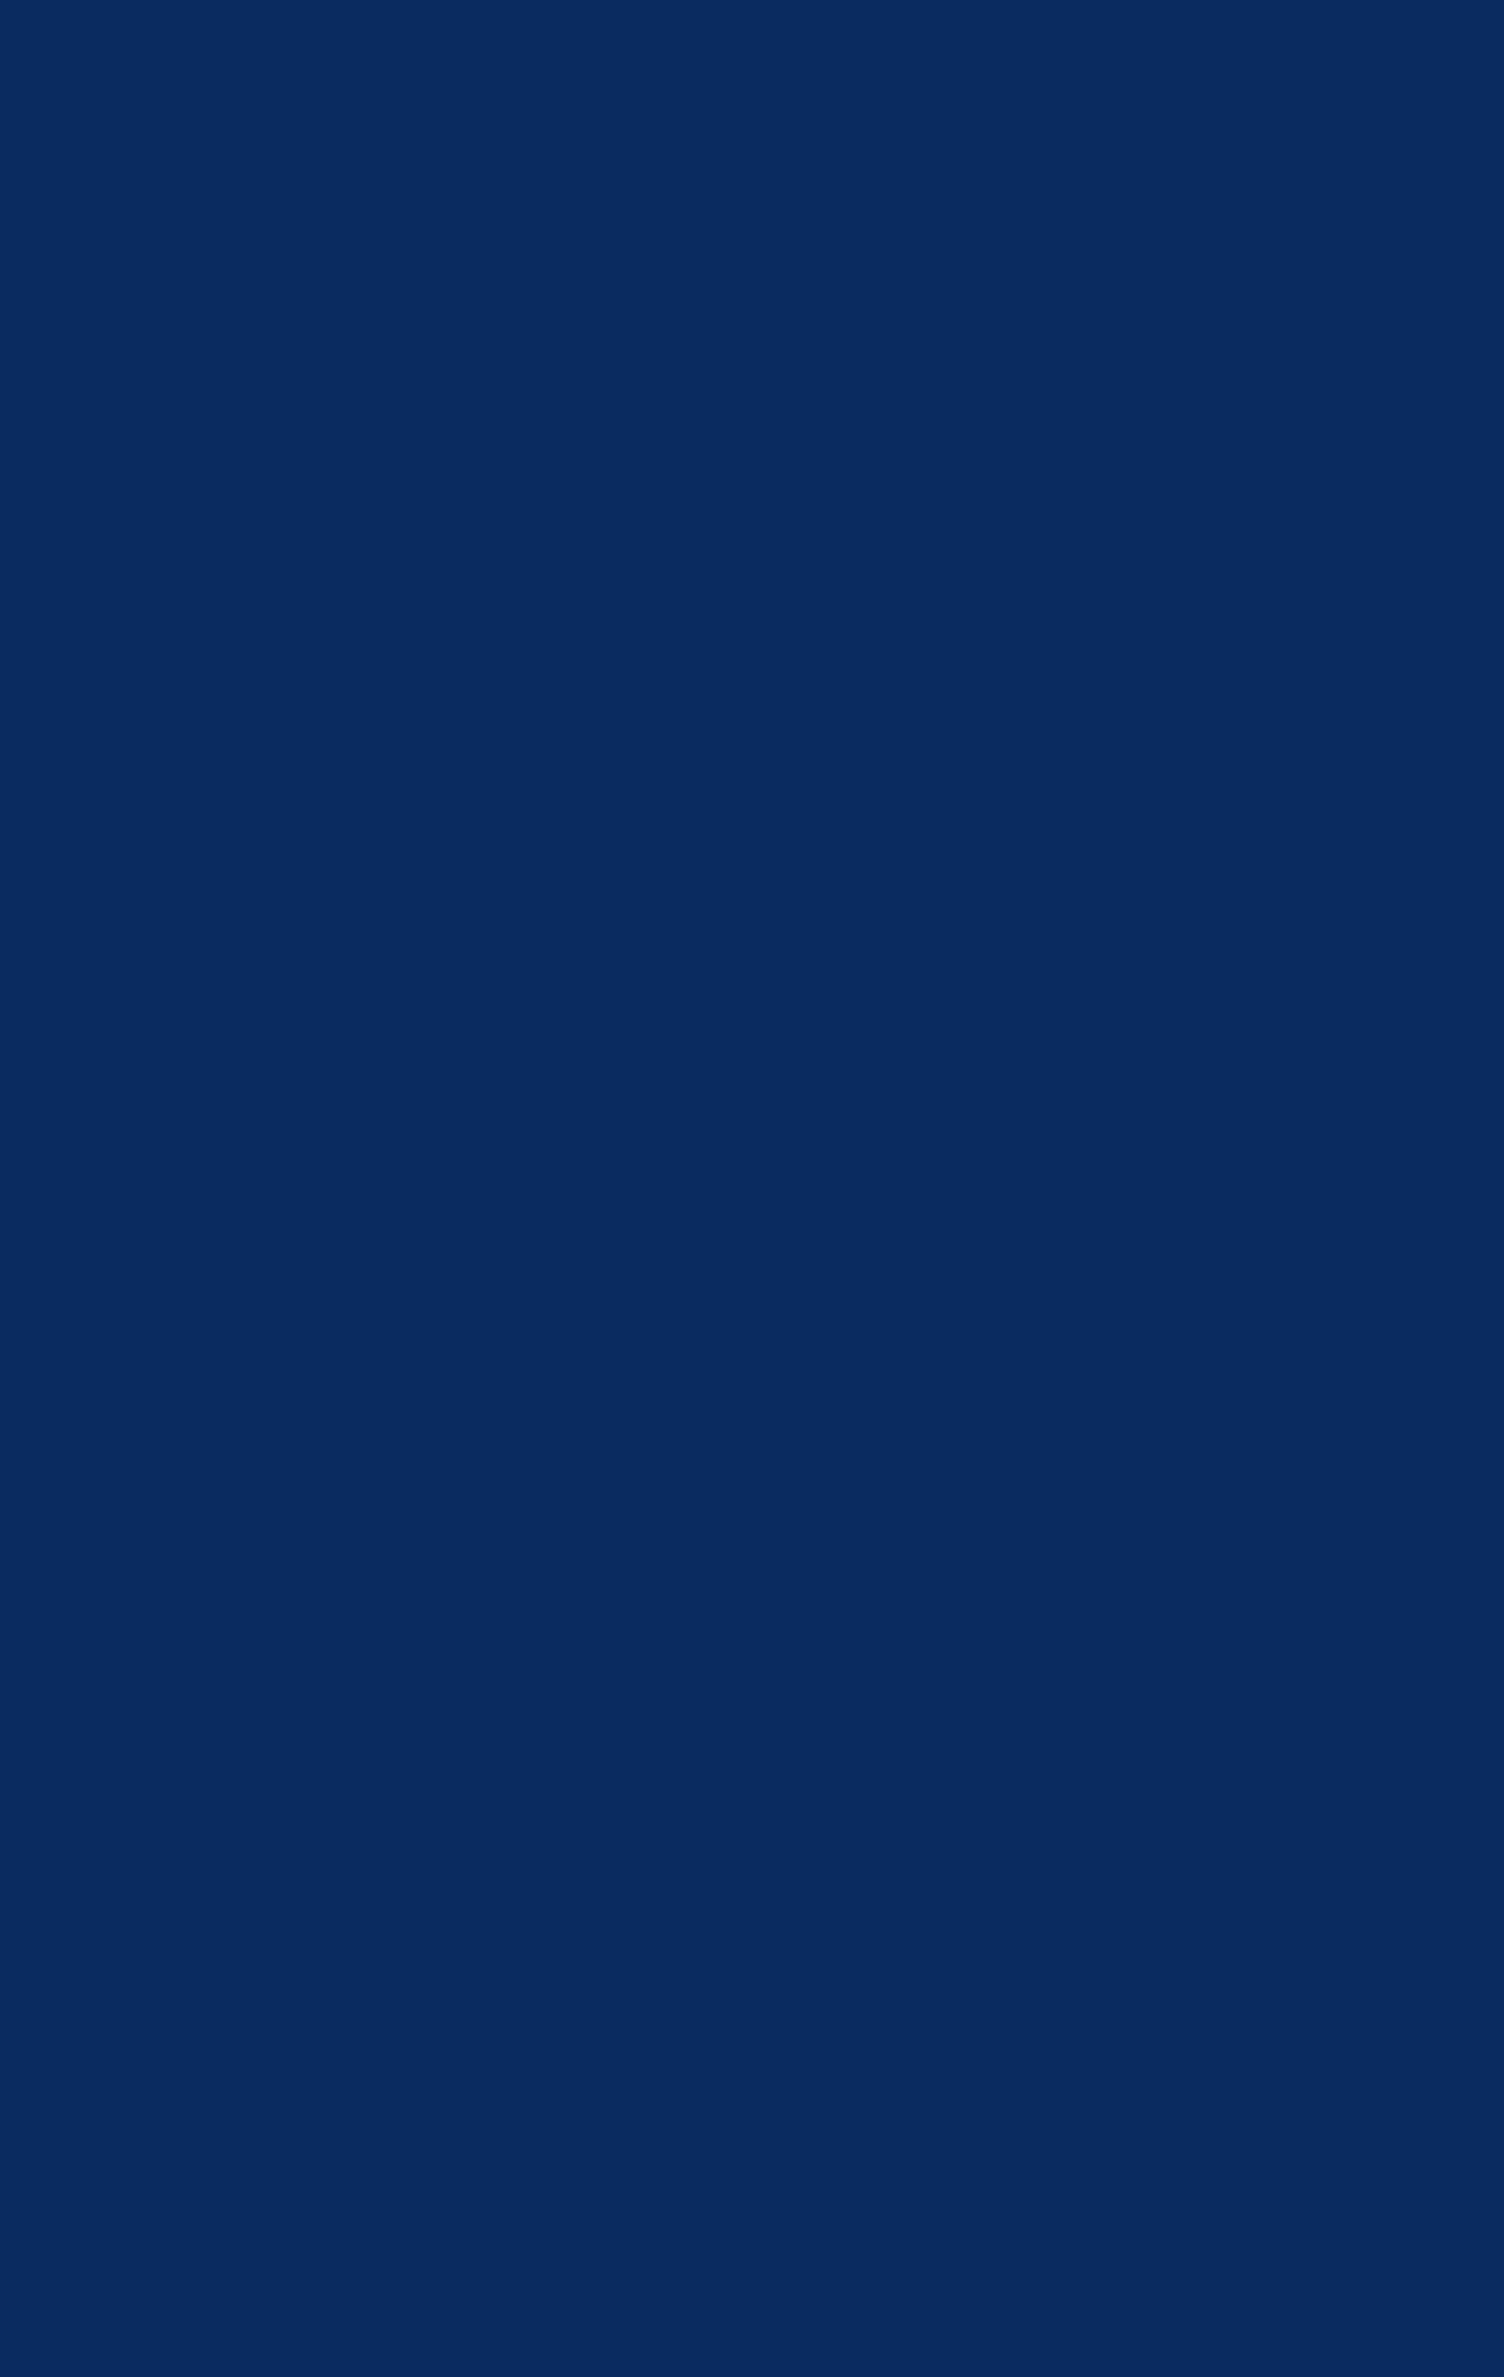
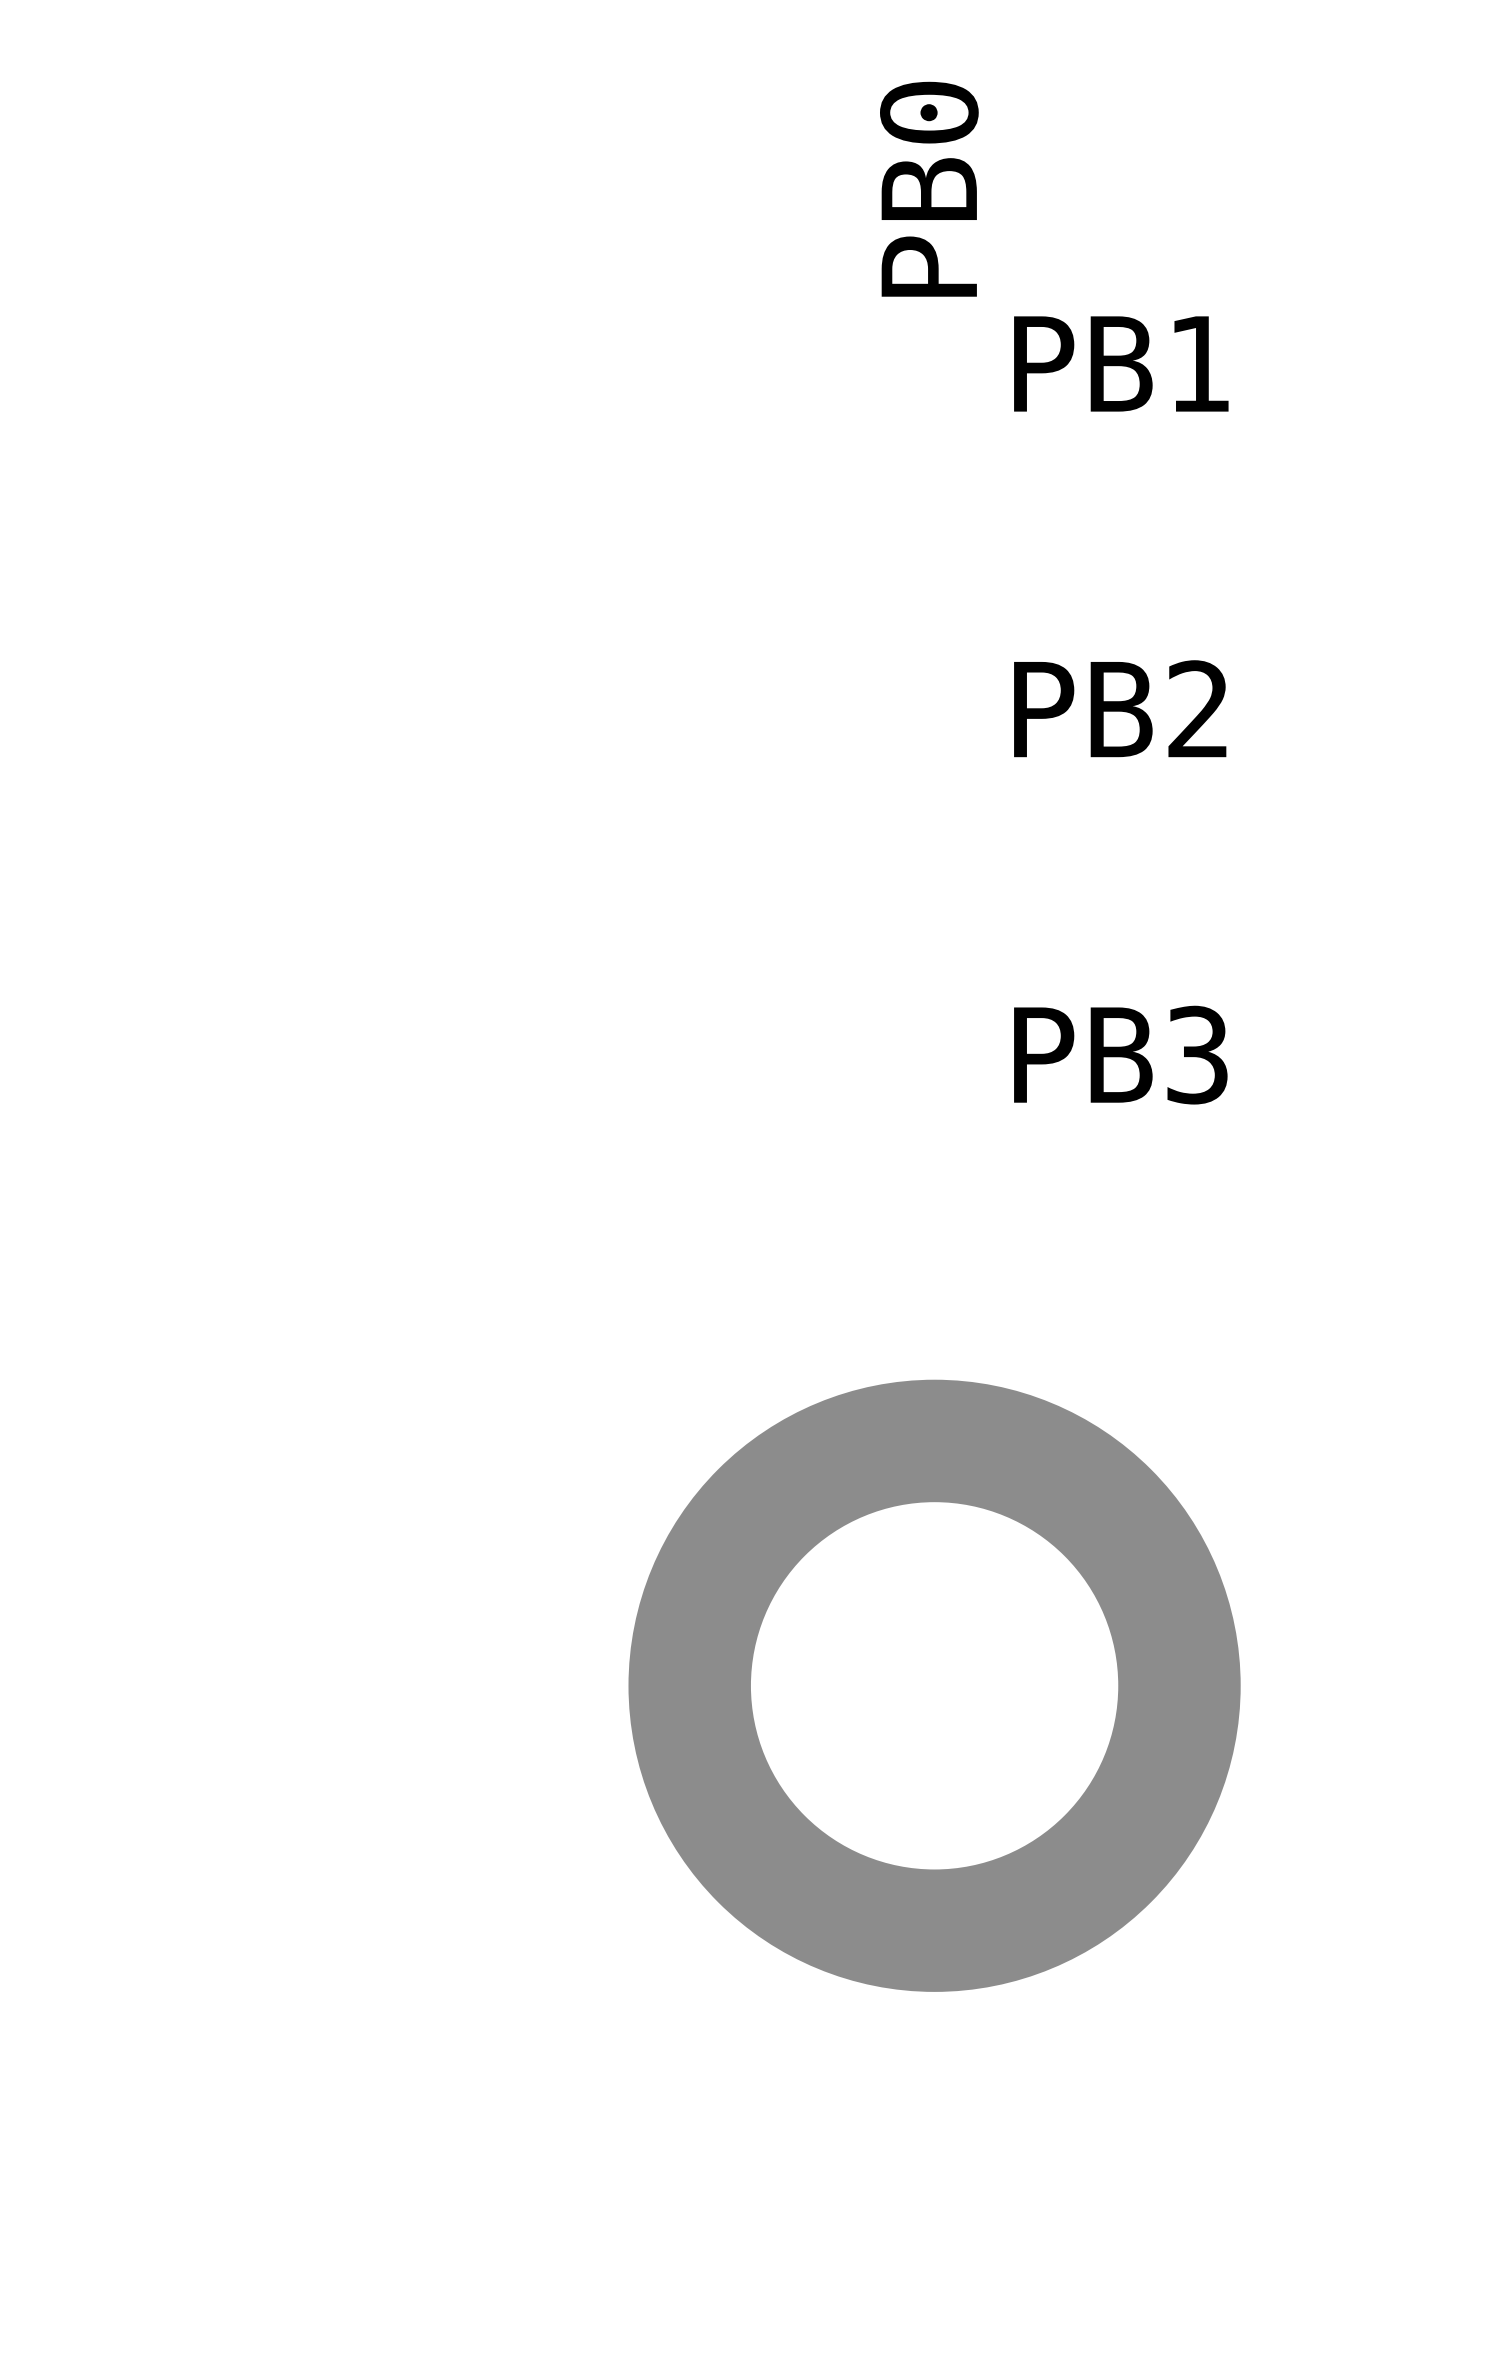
text: none -> PB0 (929, 189)
text: none -> PB1 (1121, 363)
text: none -> PB2 (1120, 708)
text: none -> PB3 (1120, 1055)
part: none -> (934, 1685)

